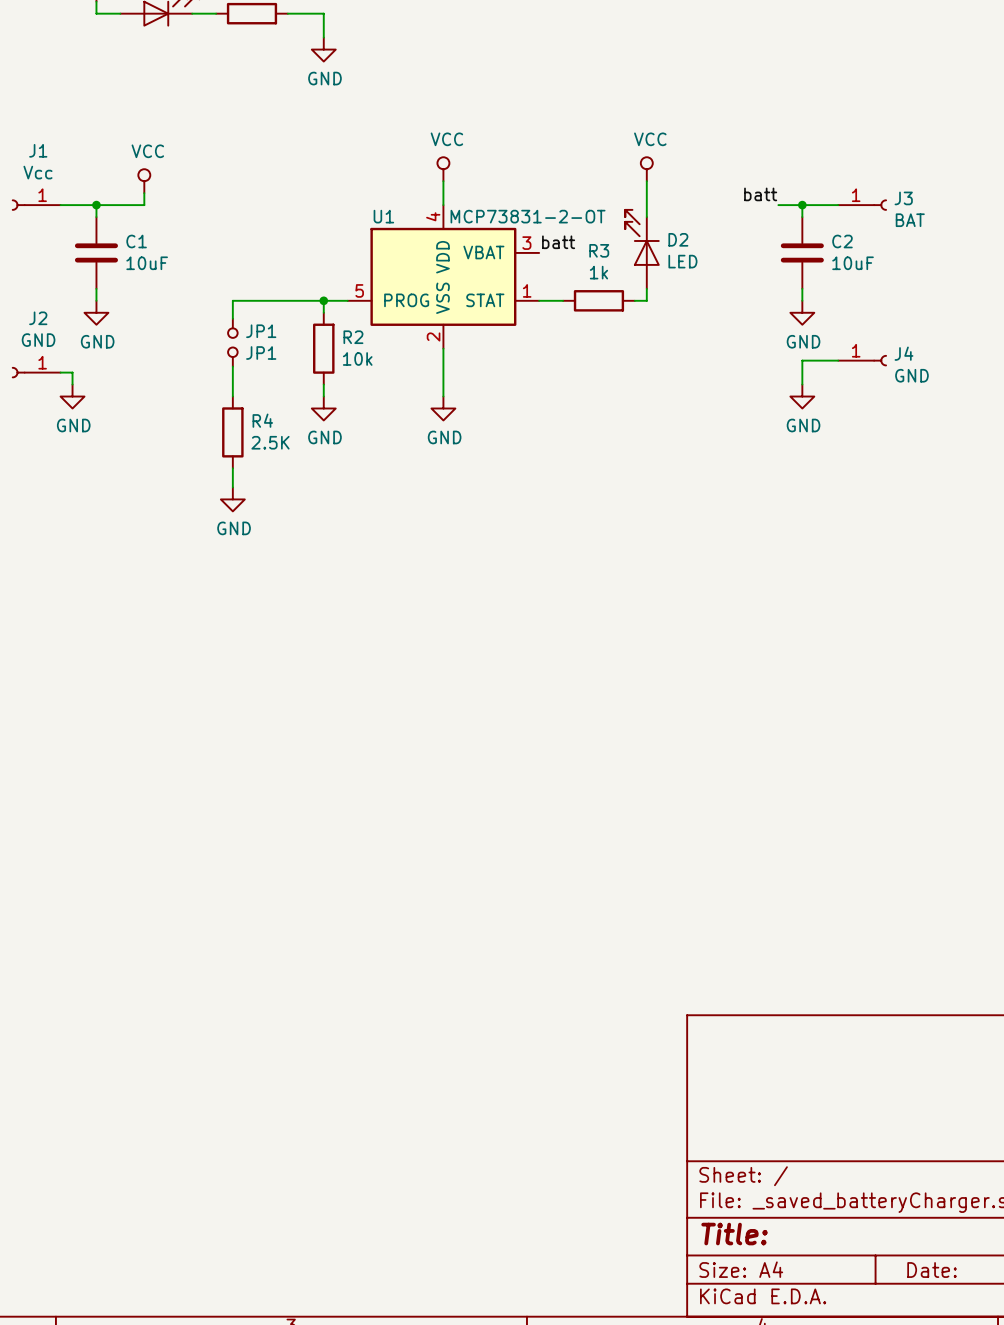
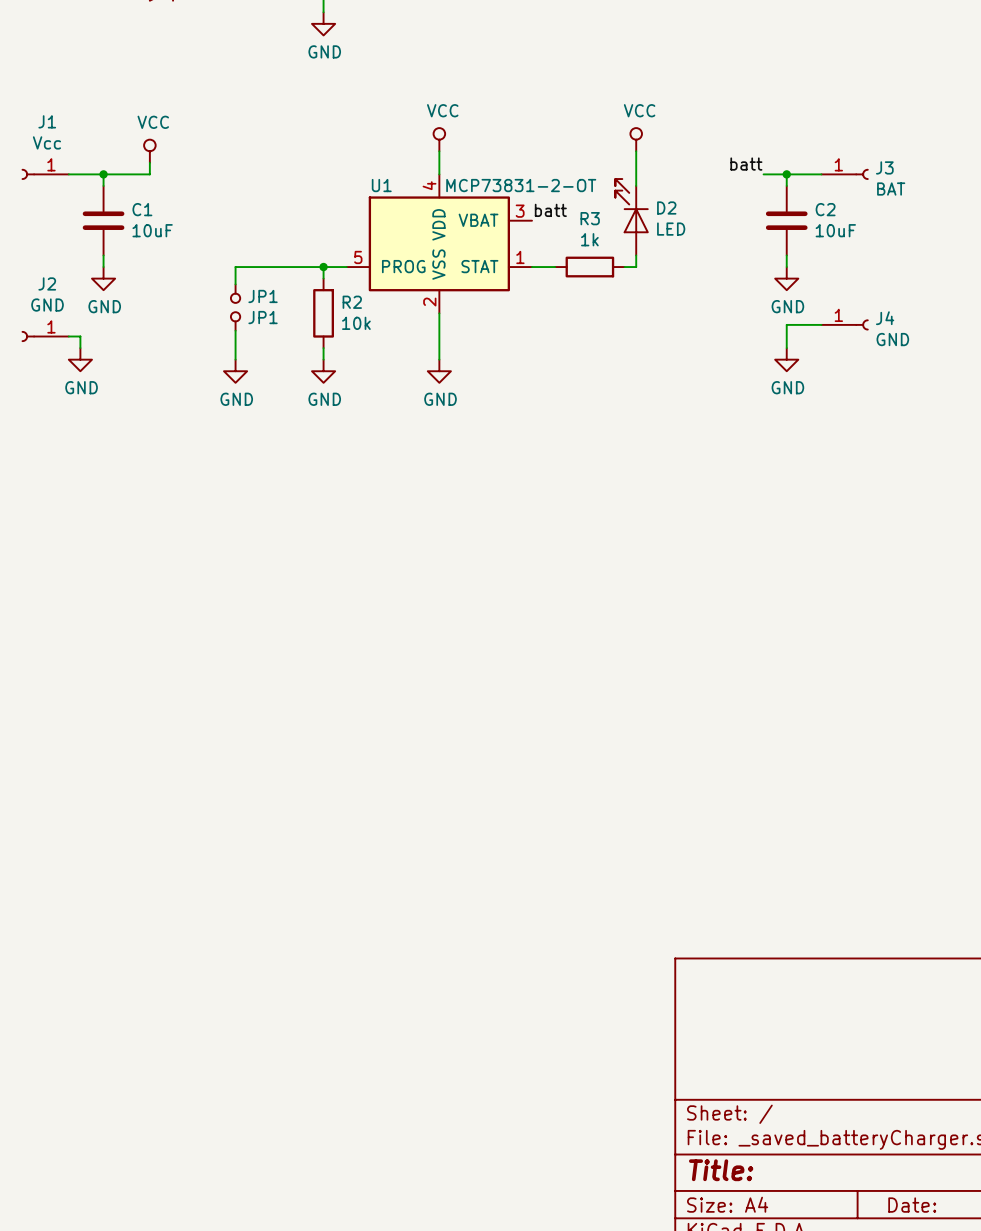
R4: 2.5K (232, 432) -> none
wire: (232, 468) (232, 487) -> none
power symbol position: GND (232, 499) -> GND (235, 371)

